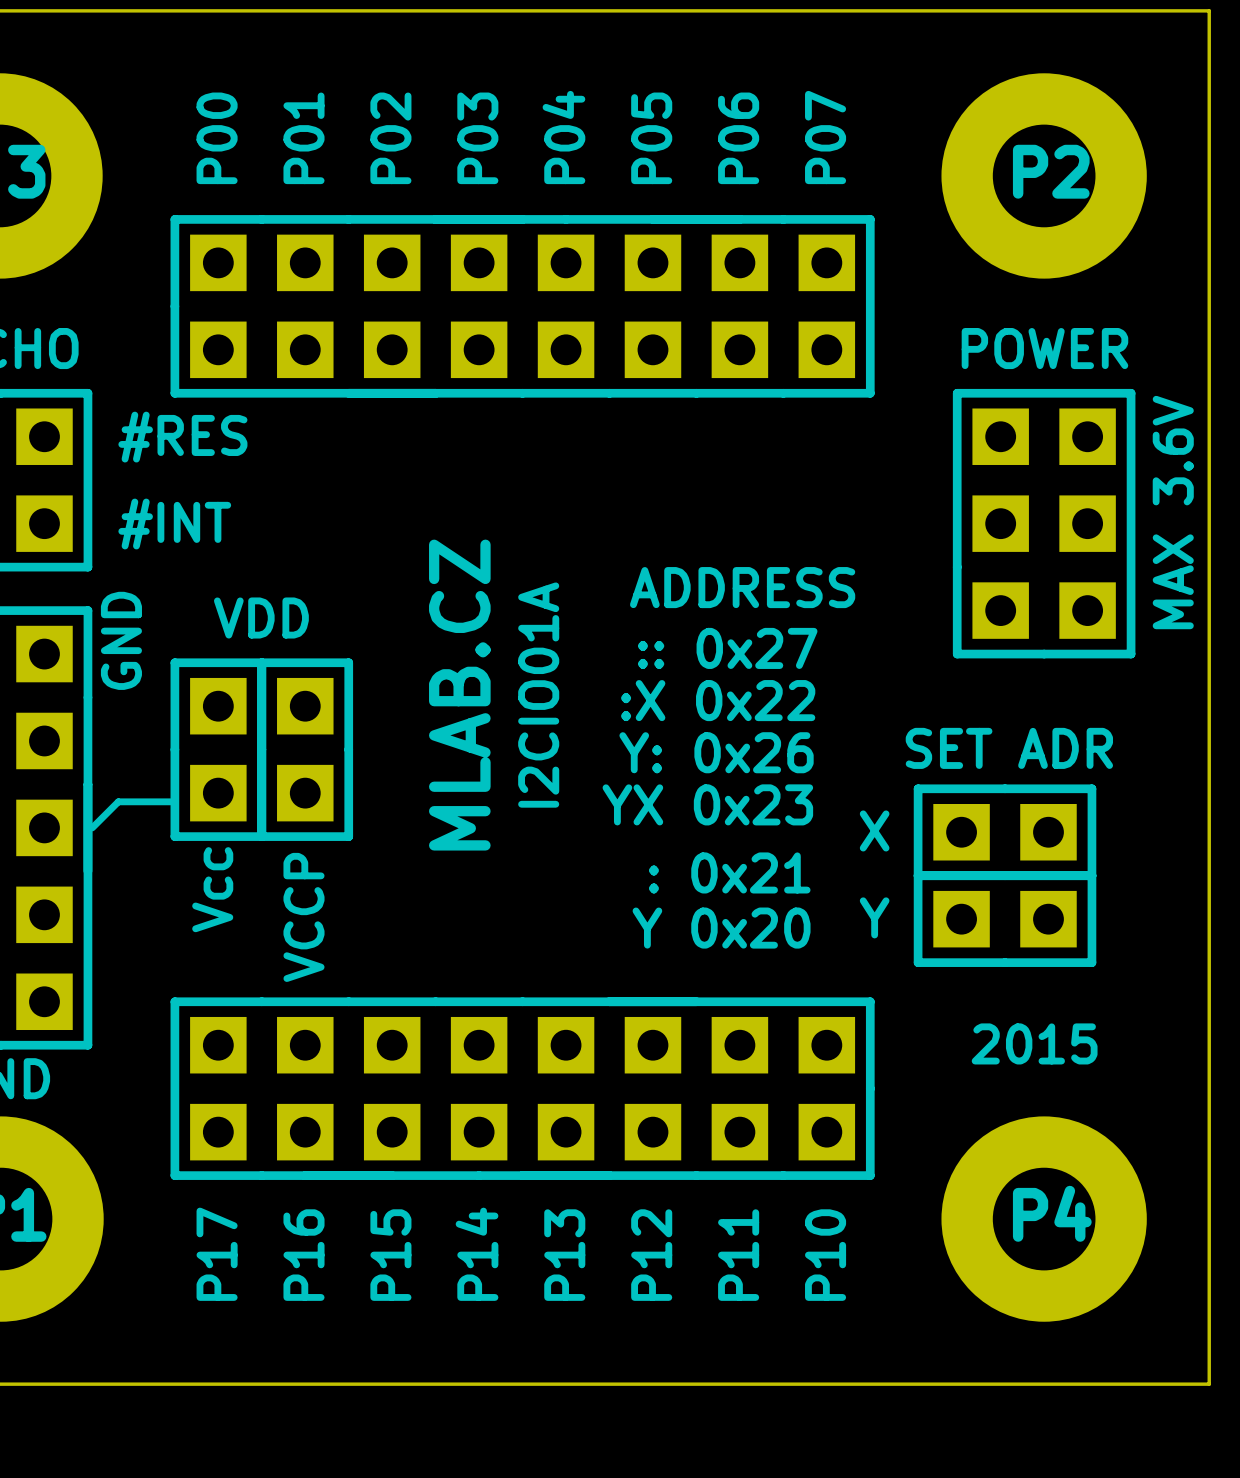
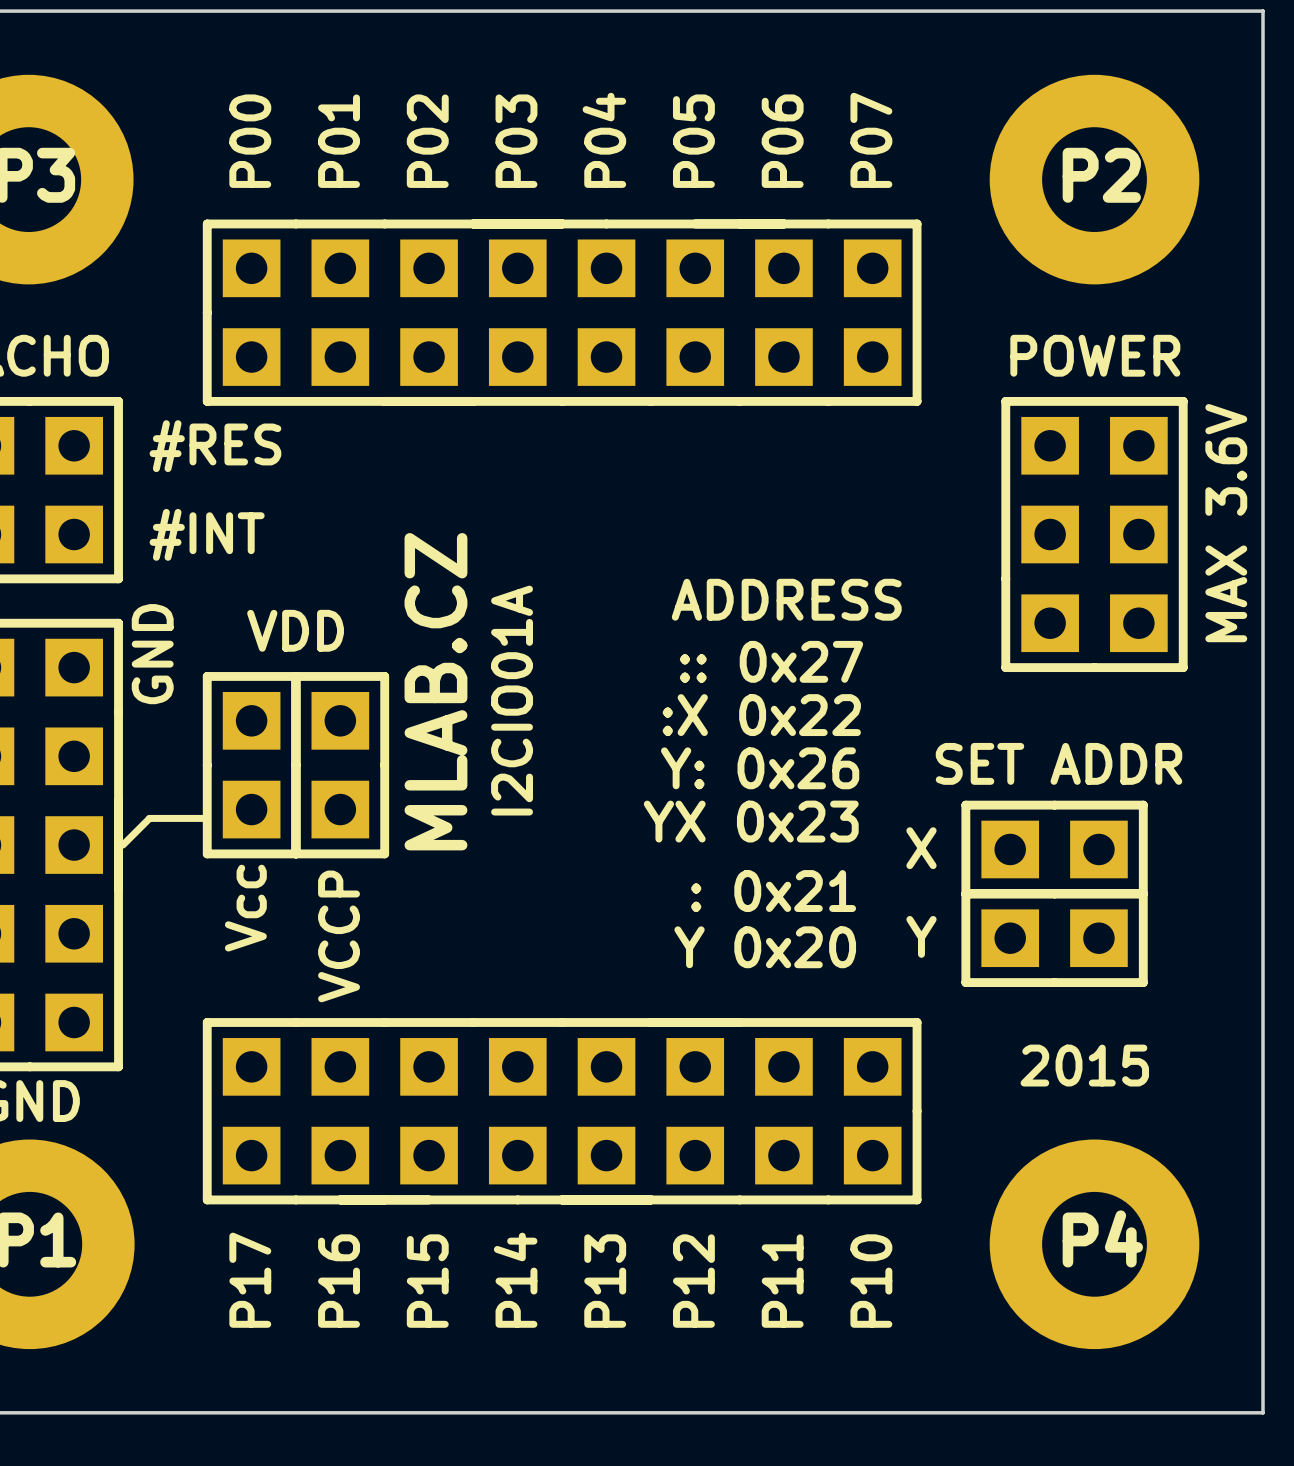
text position: MLAB.CZ (459, 695) -> MLAB.CZ (435, 691)
text position: I2CIO01A (538, 695) -> I2CIO01A (512, 700)
text: SET ADR (1009, 748) -> SET ADDR (1059, 763)

